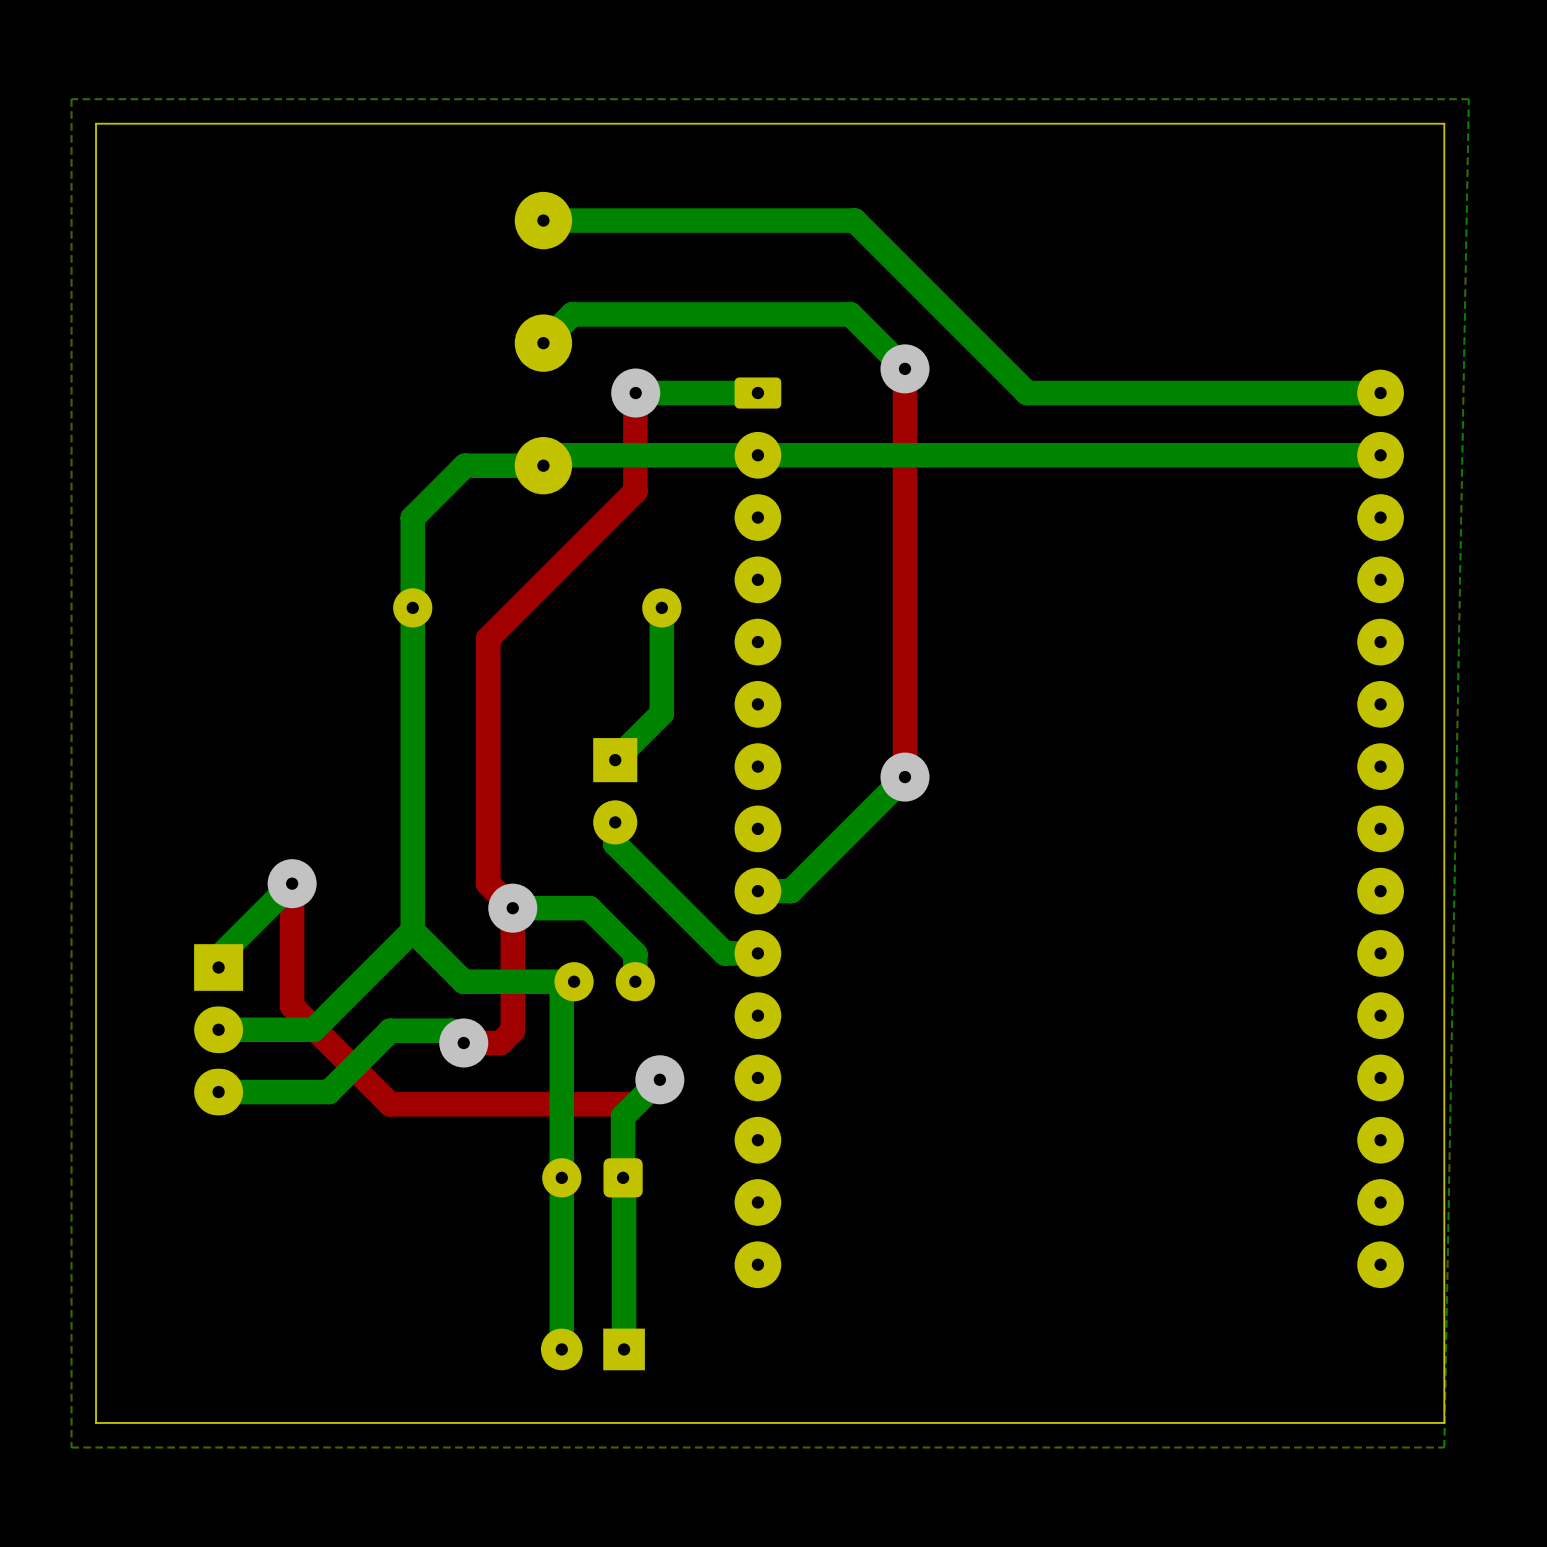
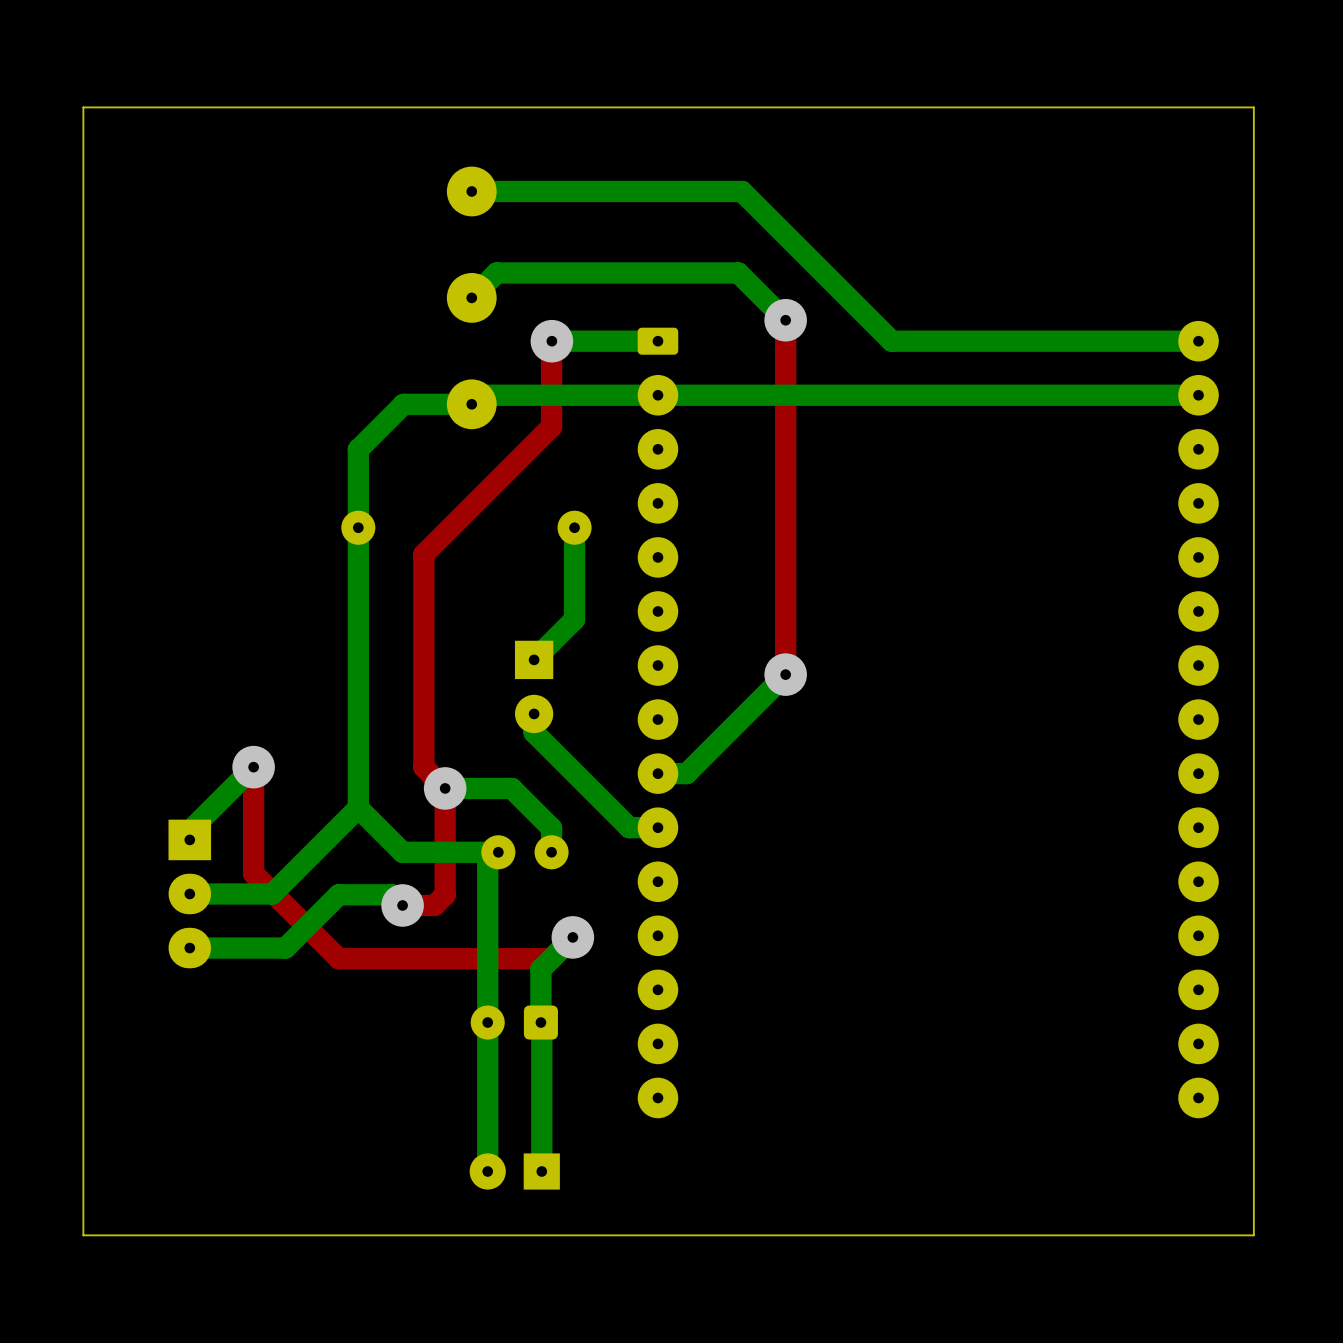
bottom zone outline: (1468, 99) (71, 99) (71, 1447) (1444, 1447) (1468, 99) -> none

